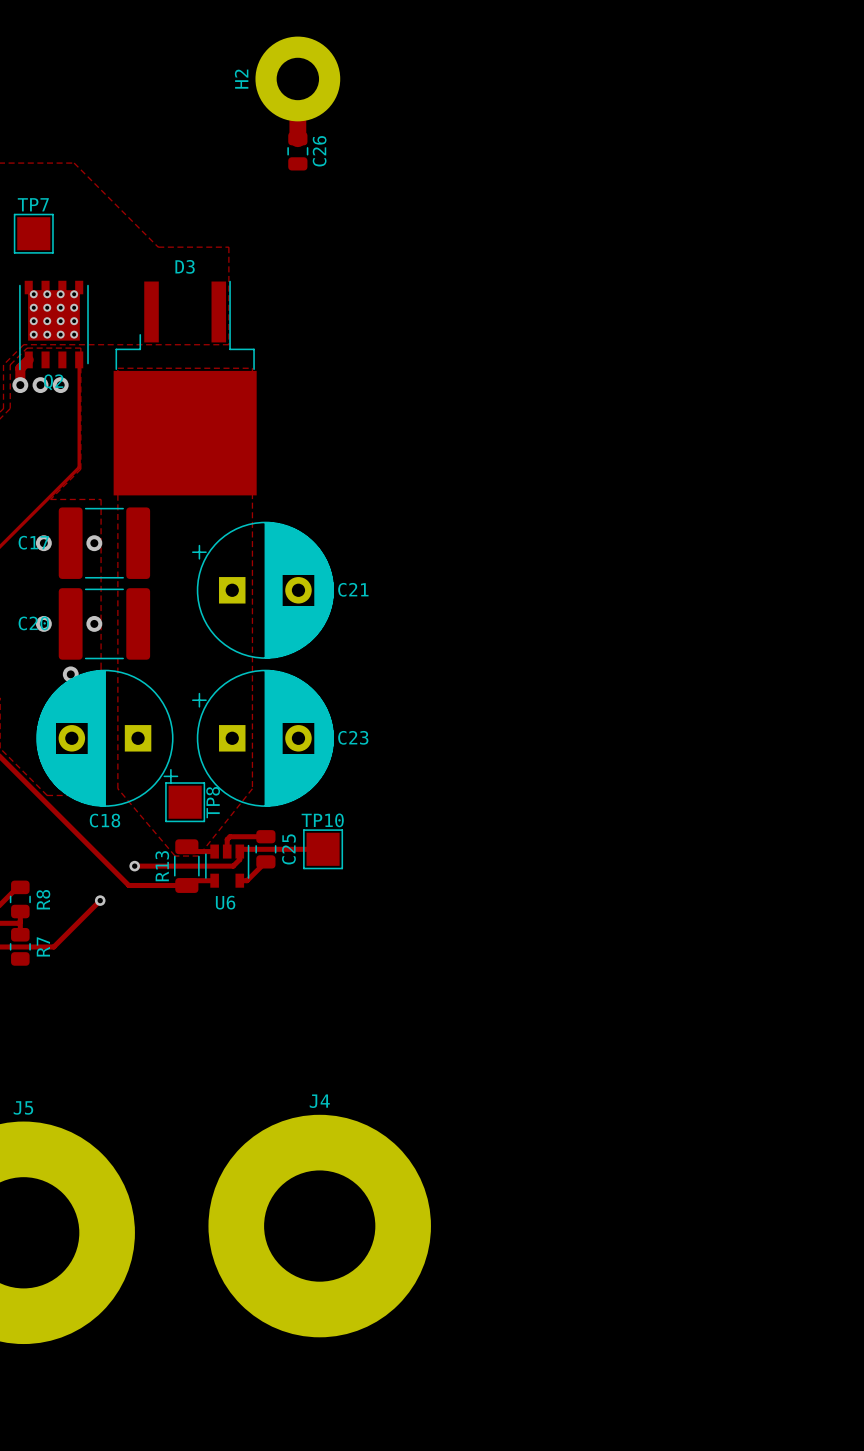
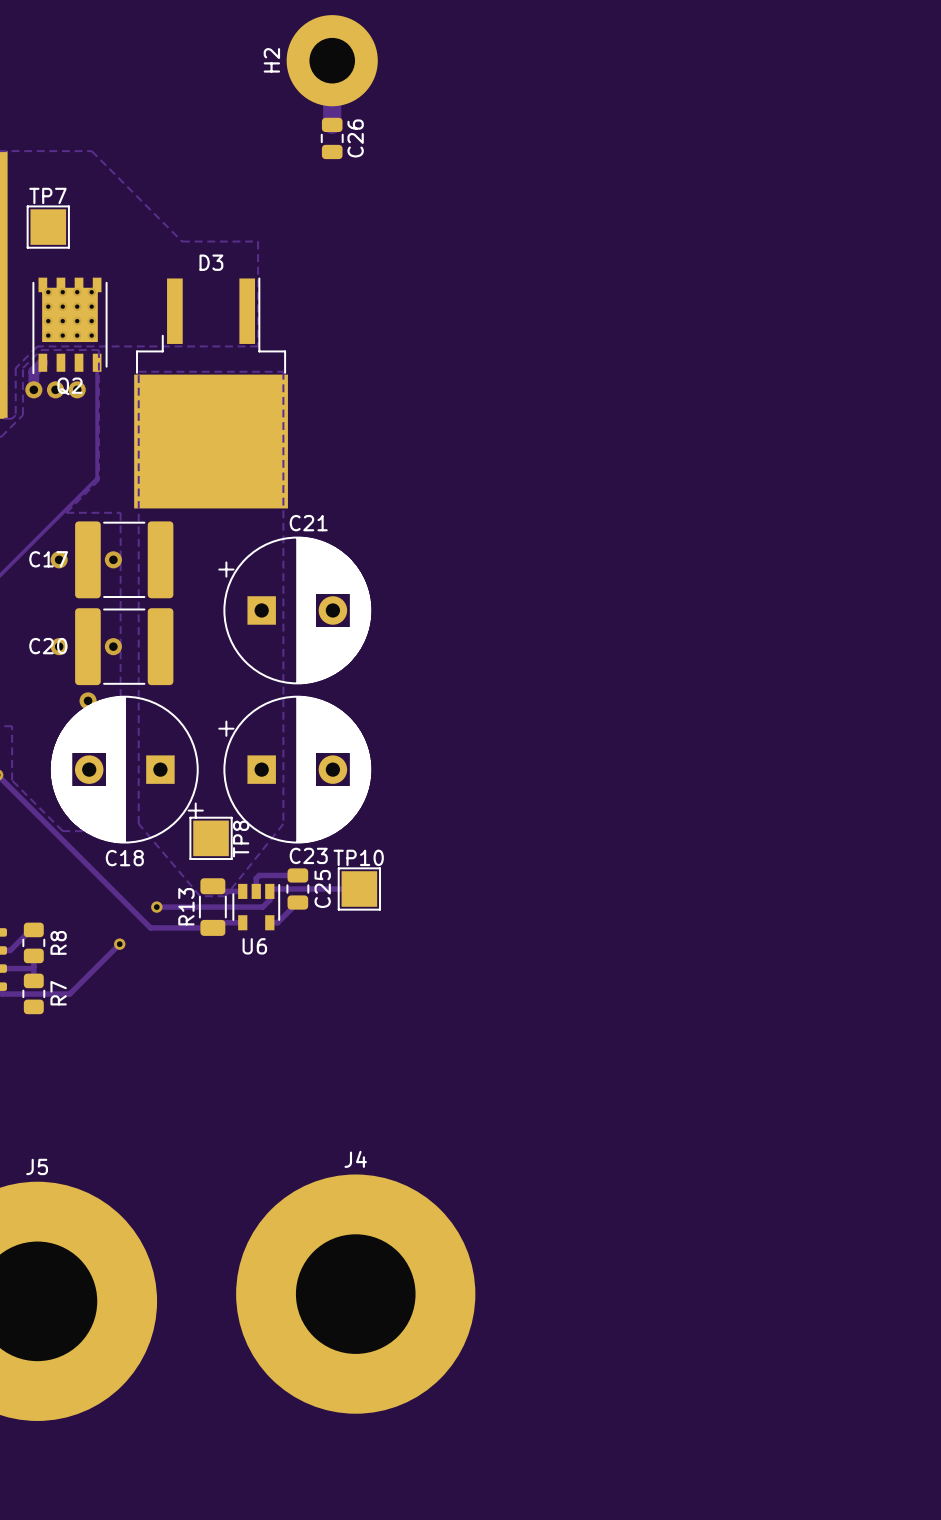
C21 name position: C21 (353, 589) -> C21 (308, 523)
C23 name position: C23 (353, 737) -> C23 (308, 855)

